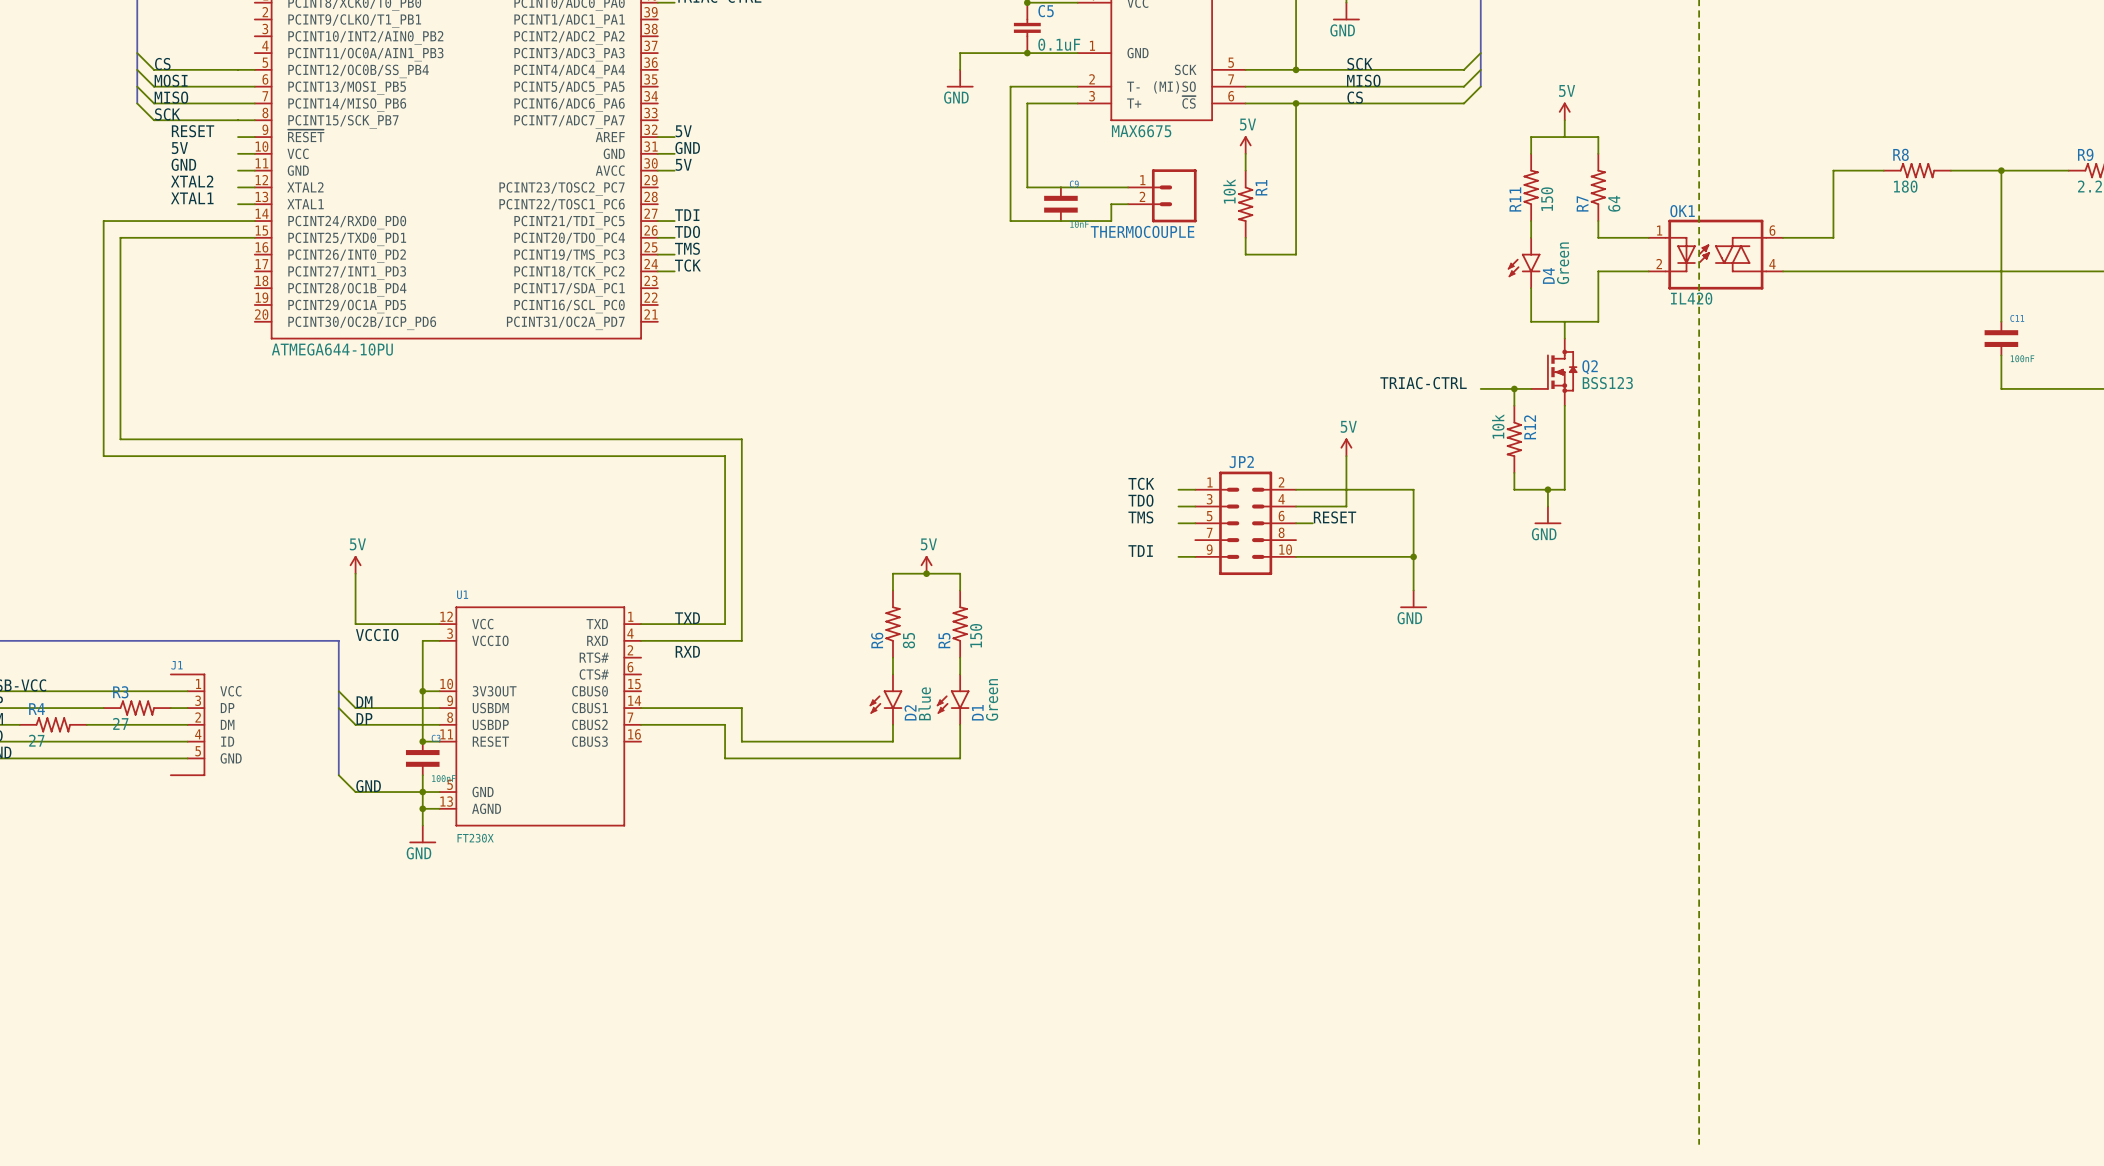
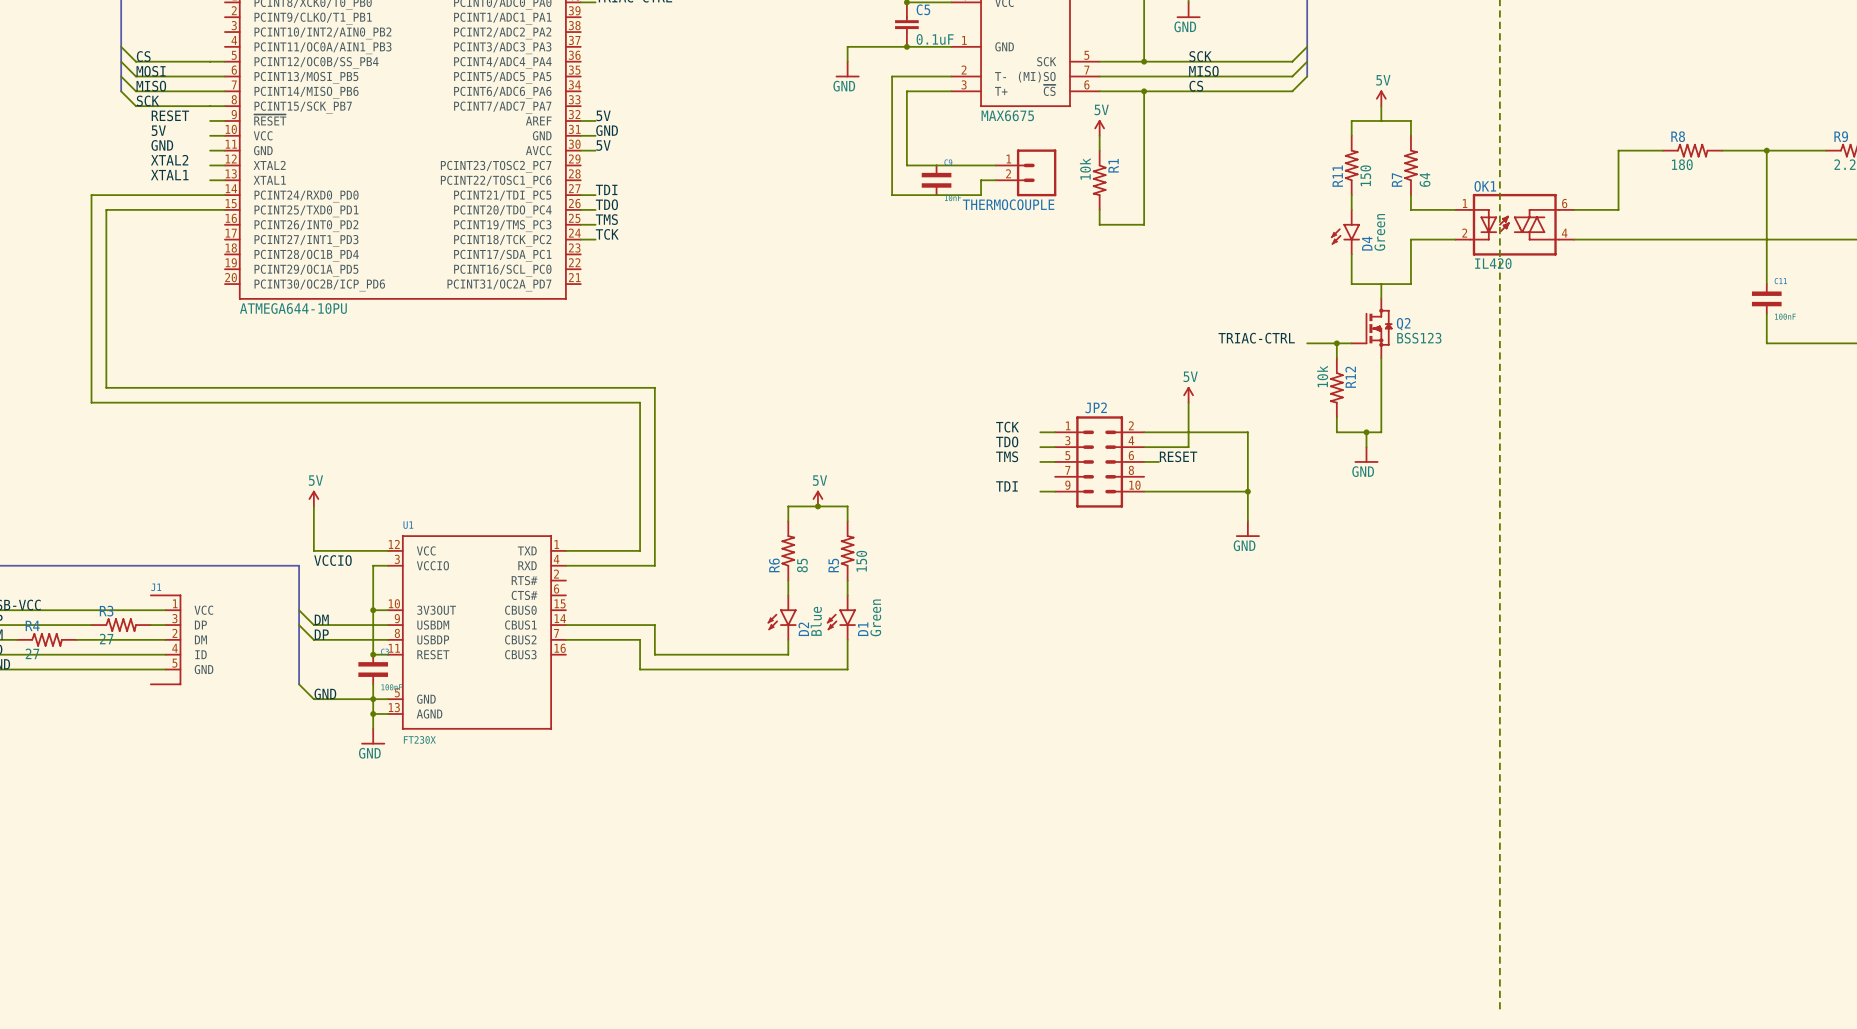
label: TXD (687, 618) -> none
label: RXD (687, 651) -> none

